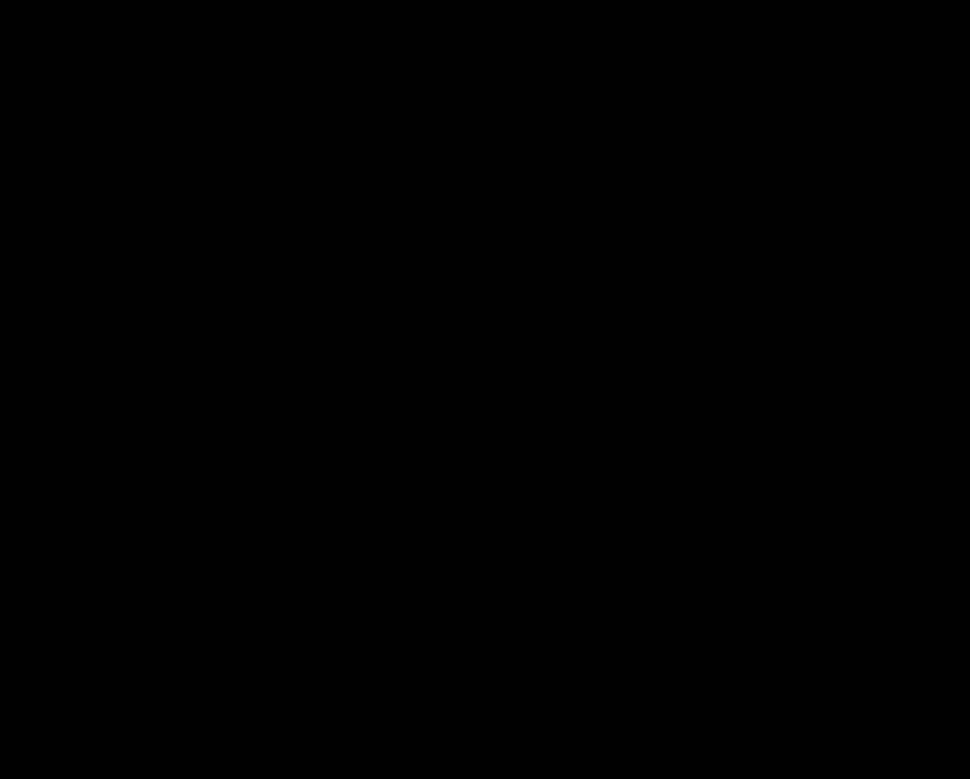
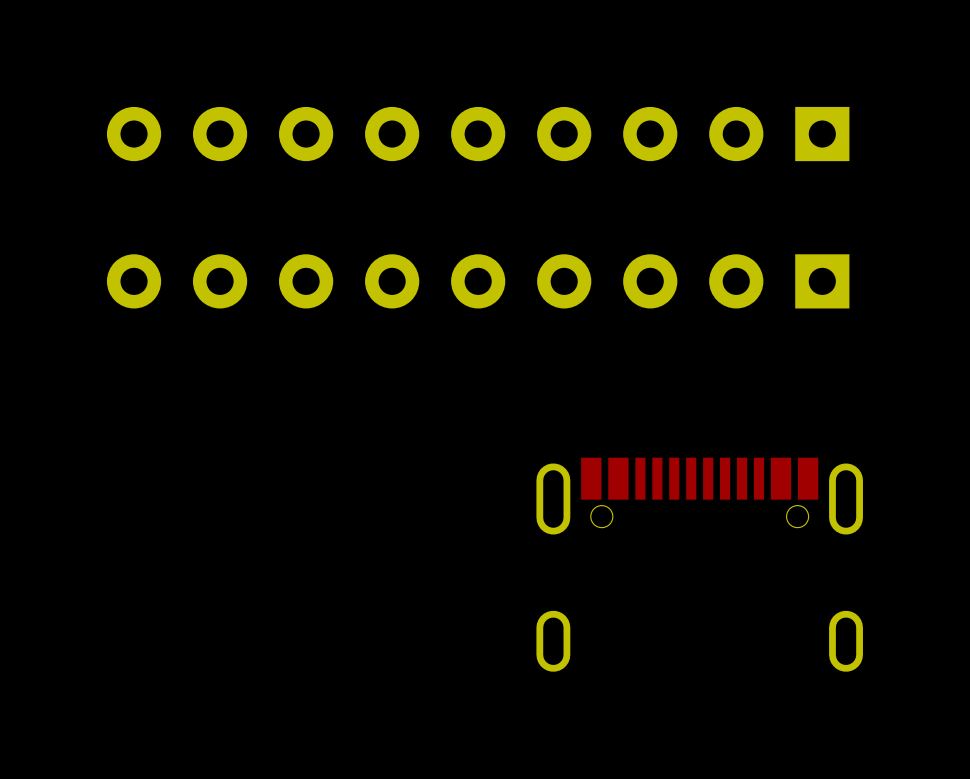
part: none -> (478, 134)
part: none -> (478, 281)
part: none -> (699, 564)

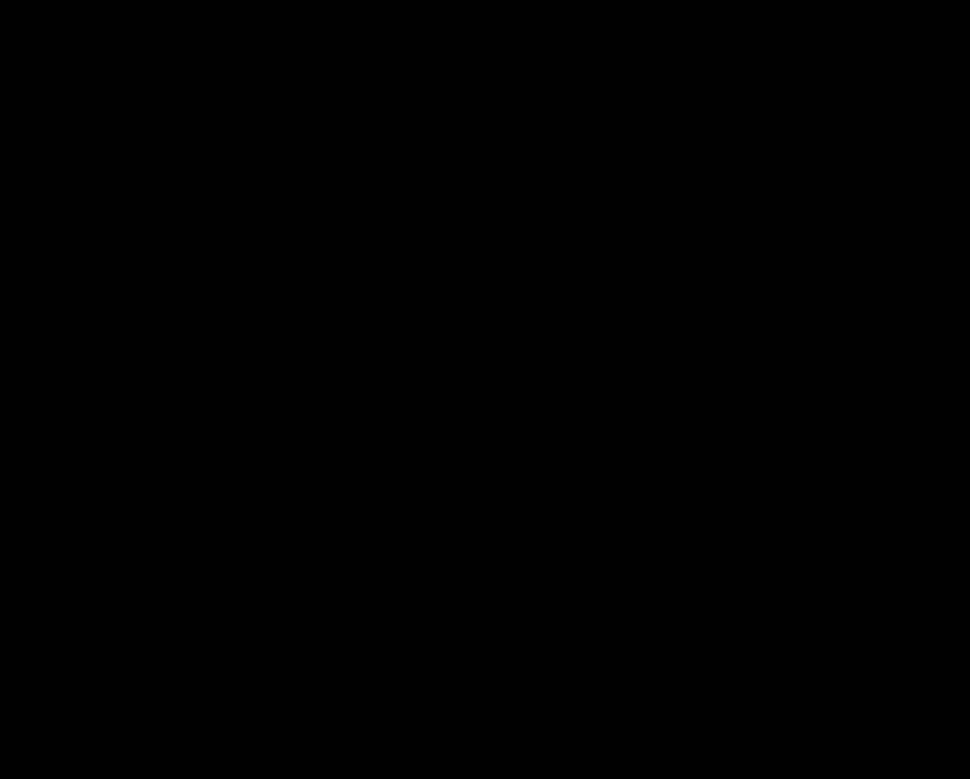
part: (478, 134) -> none
part: (478, 281) -> none
part: (699, 564) -> none

